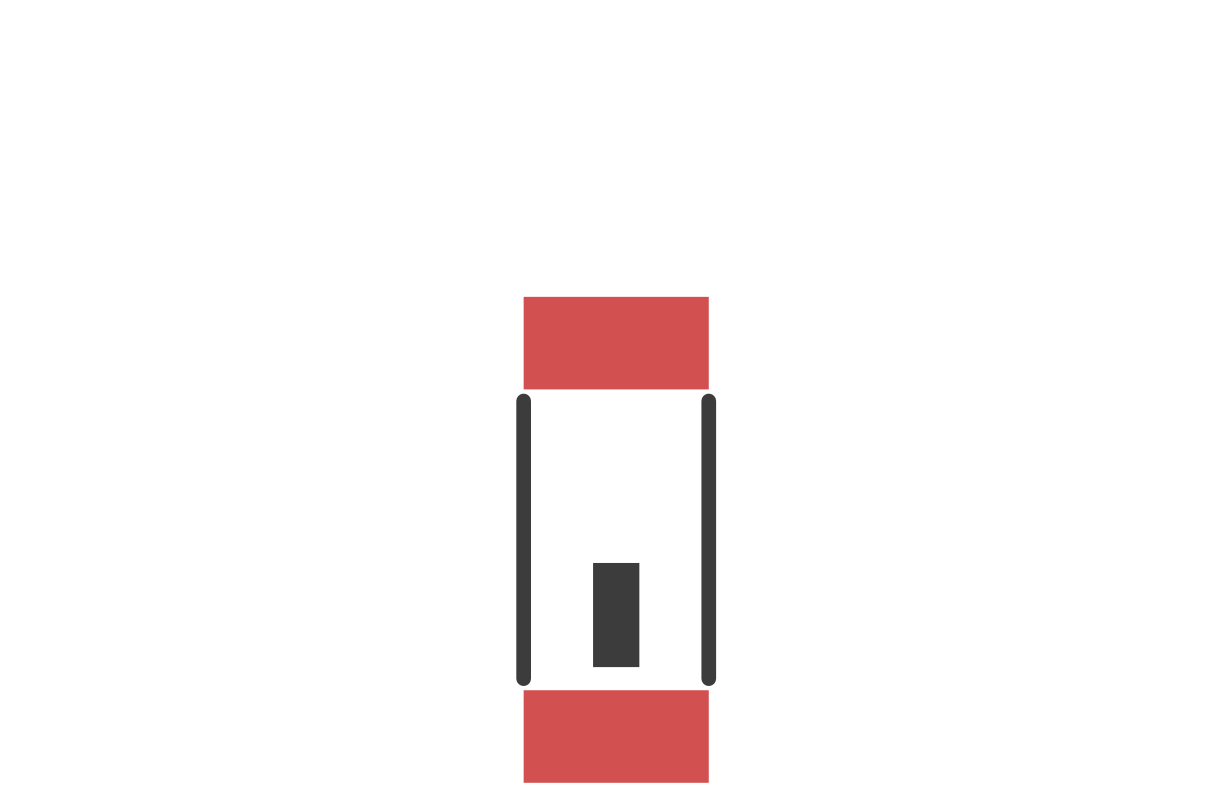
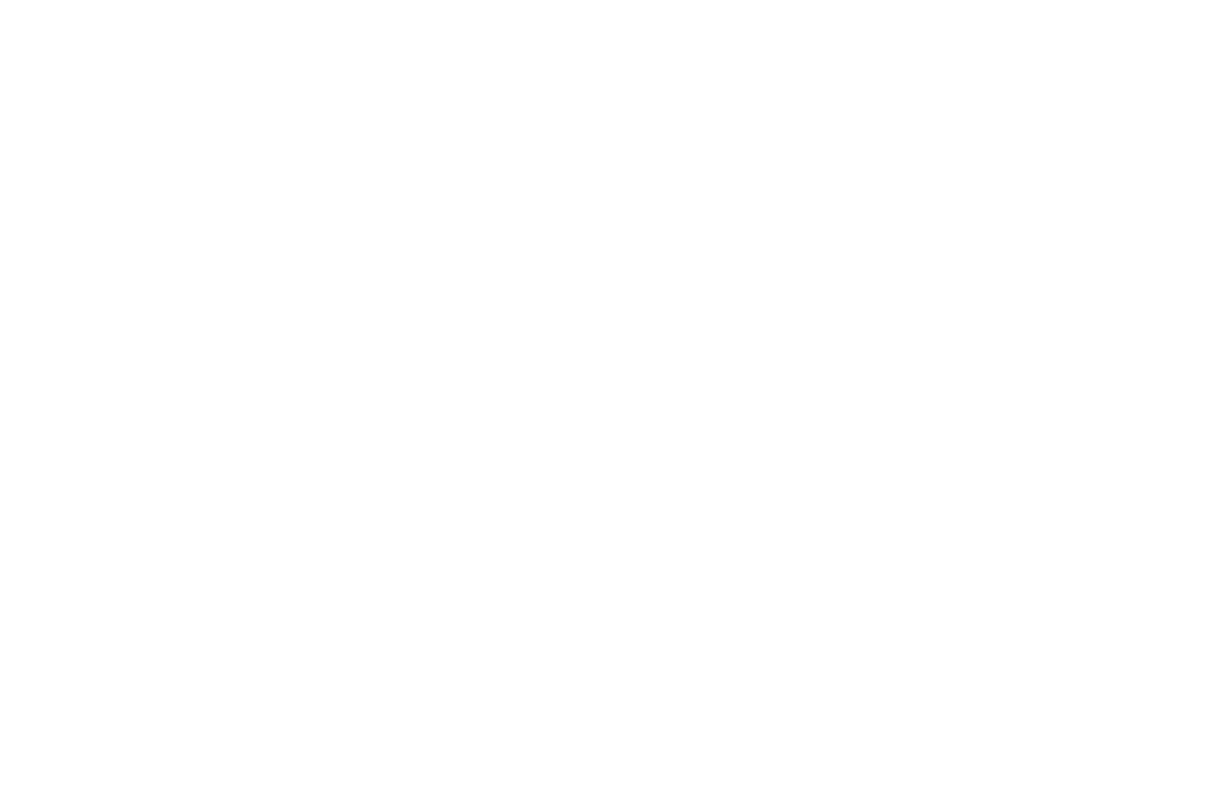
part: (616, 539) -> none

